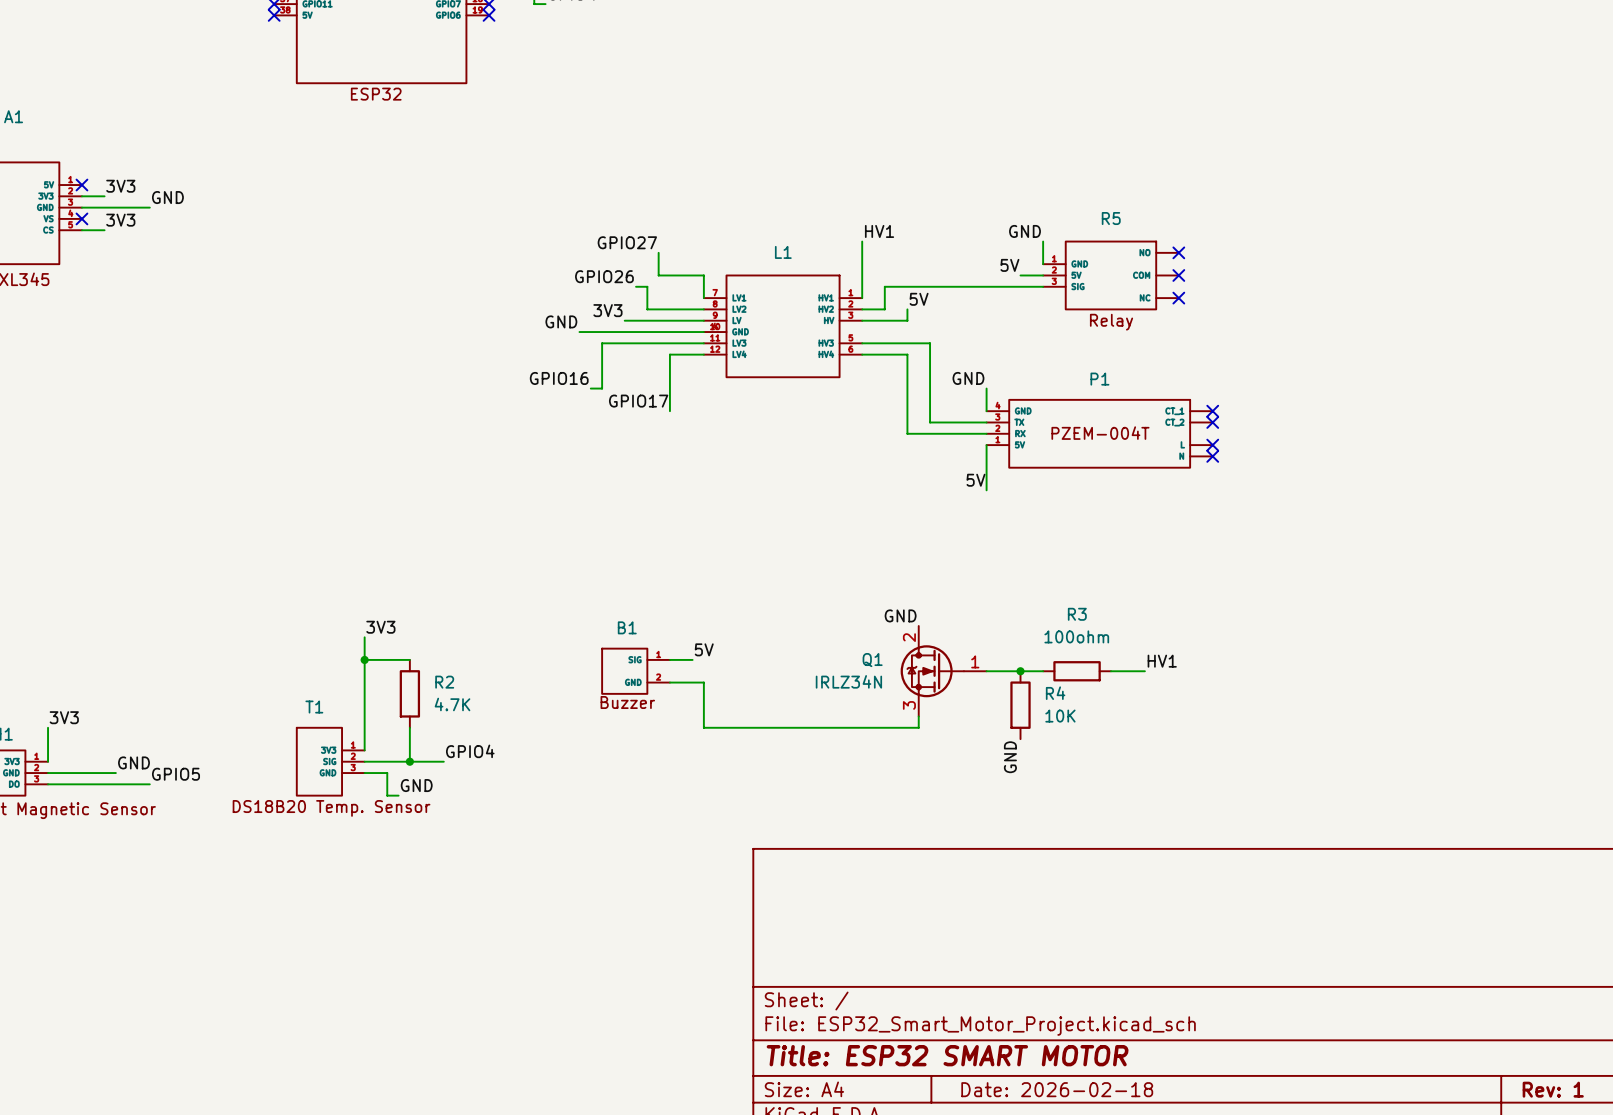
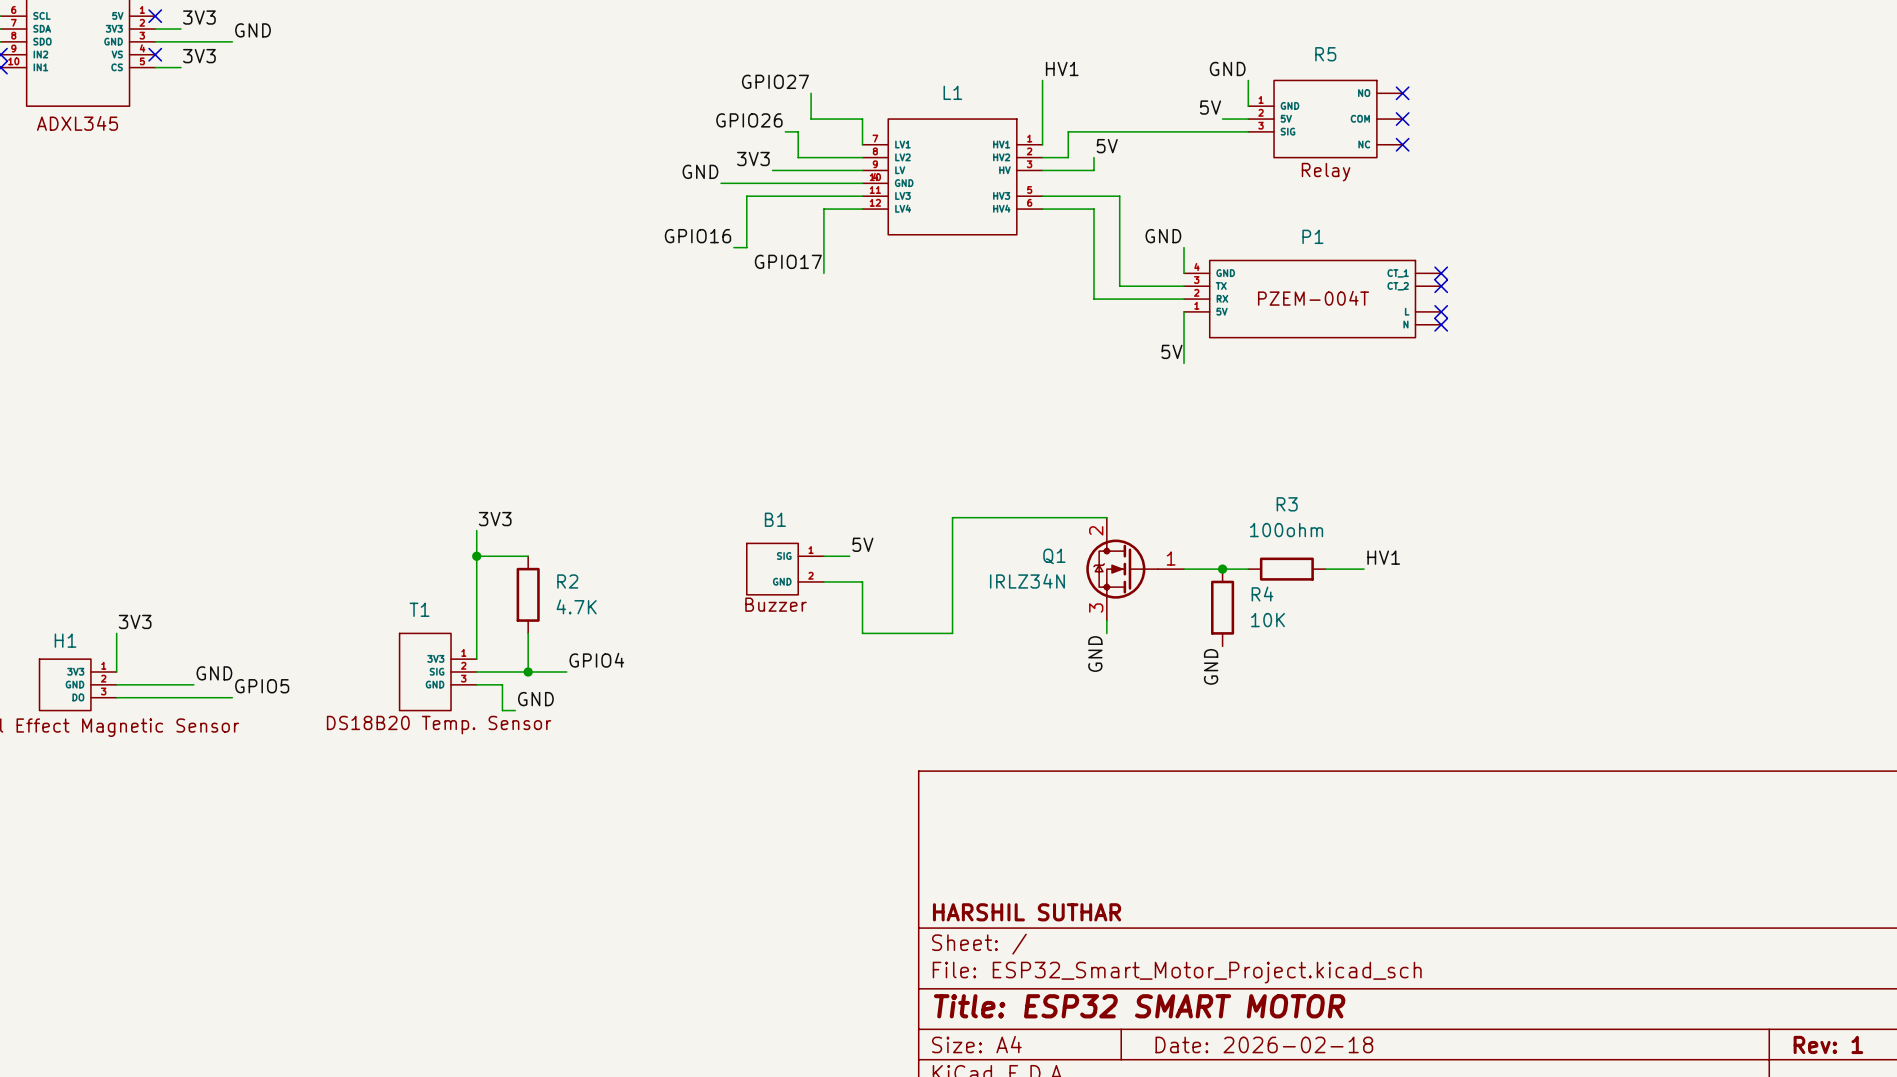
label rotation: 0° (900, 615) -> 90° counterclockwise (1095, 654)
label position: GND (900, 615) -> GND (1095, 654)
wire: (783, 727) (918, 727) -> (952, 633) (952, 517) (1106, 517)
title block: none -> HARSHIL SUTHAR (1027, 912)

